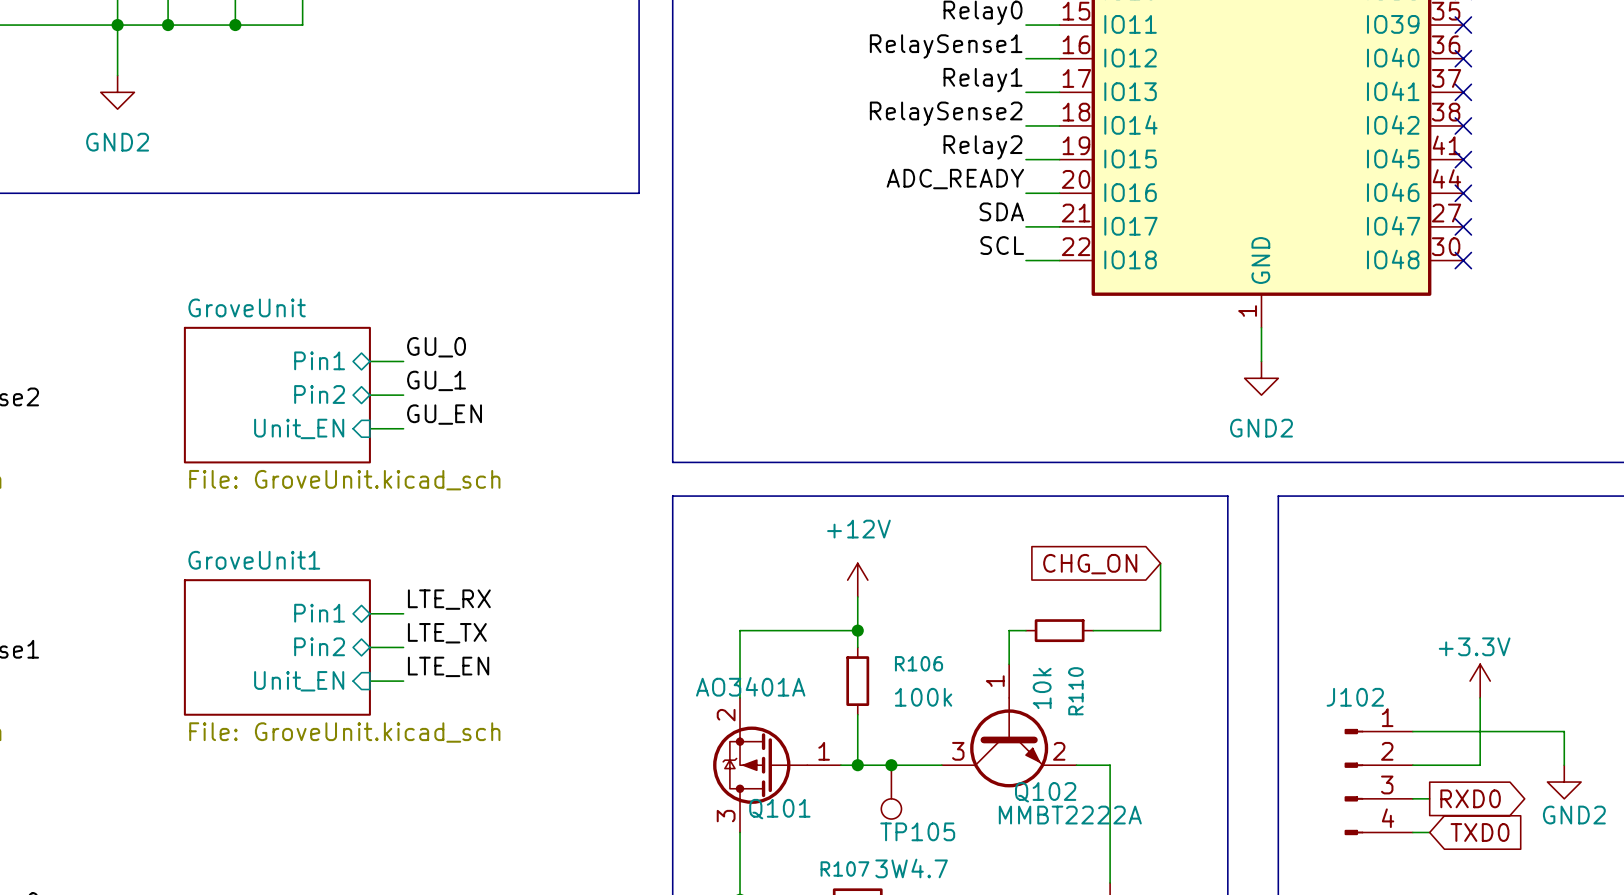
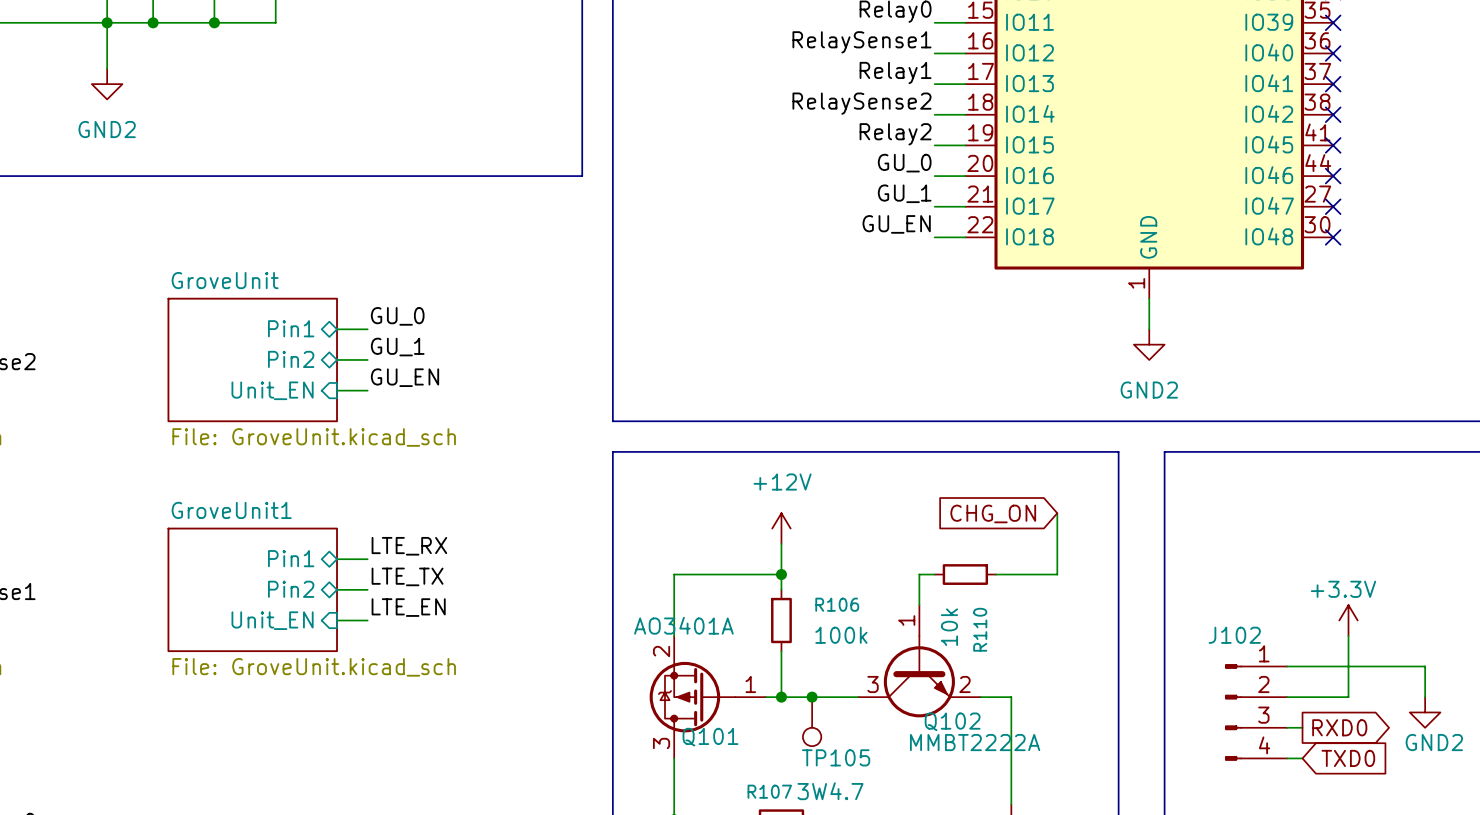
label: ADC_READY (955, 179) -> GU_0 (904, 163)
label: SDA (1001, 211) -> GU_1 (904, 193)
label: SCL (1002, 245) -> GU_EN (896, 224)

